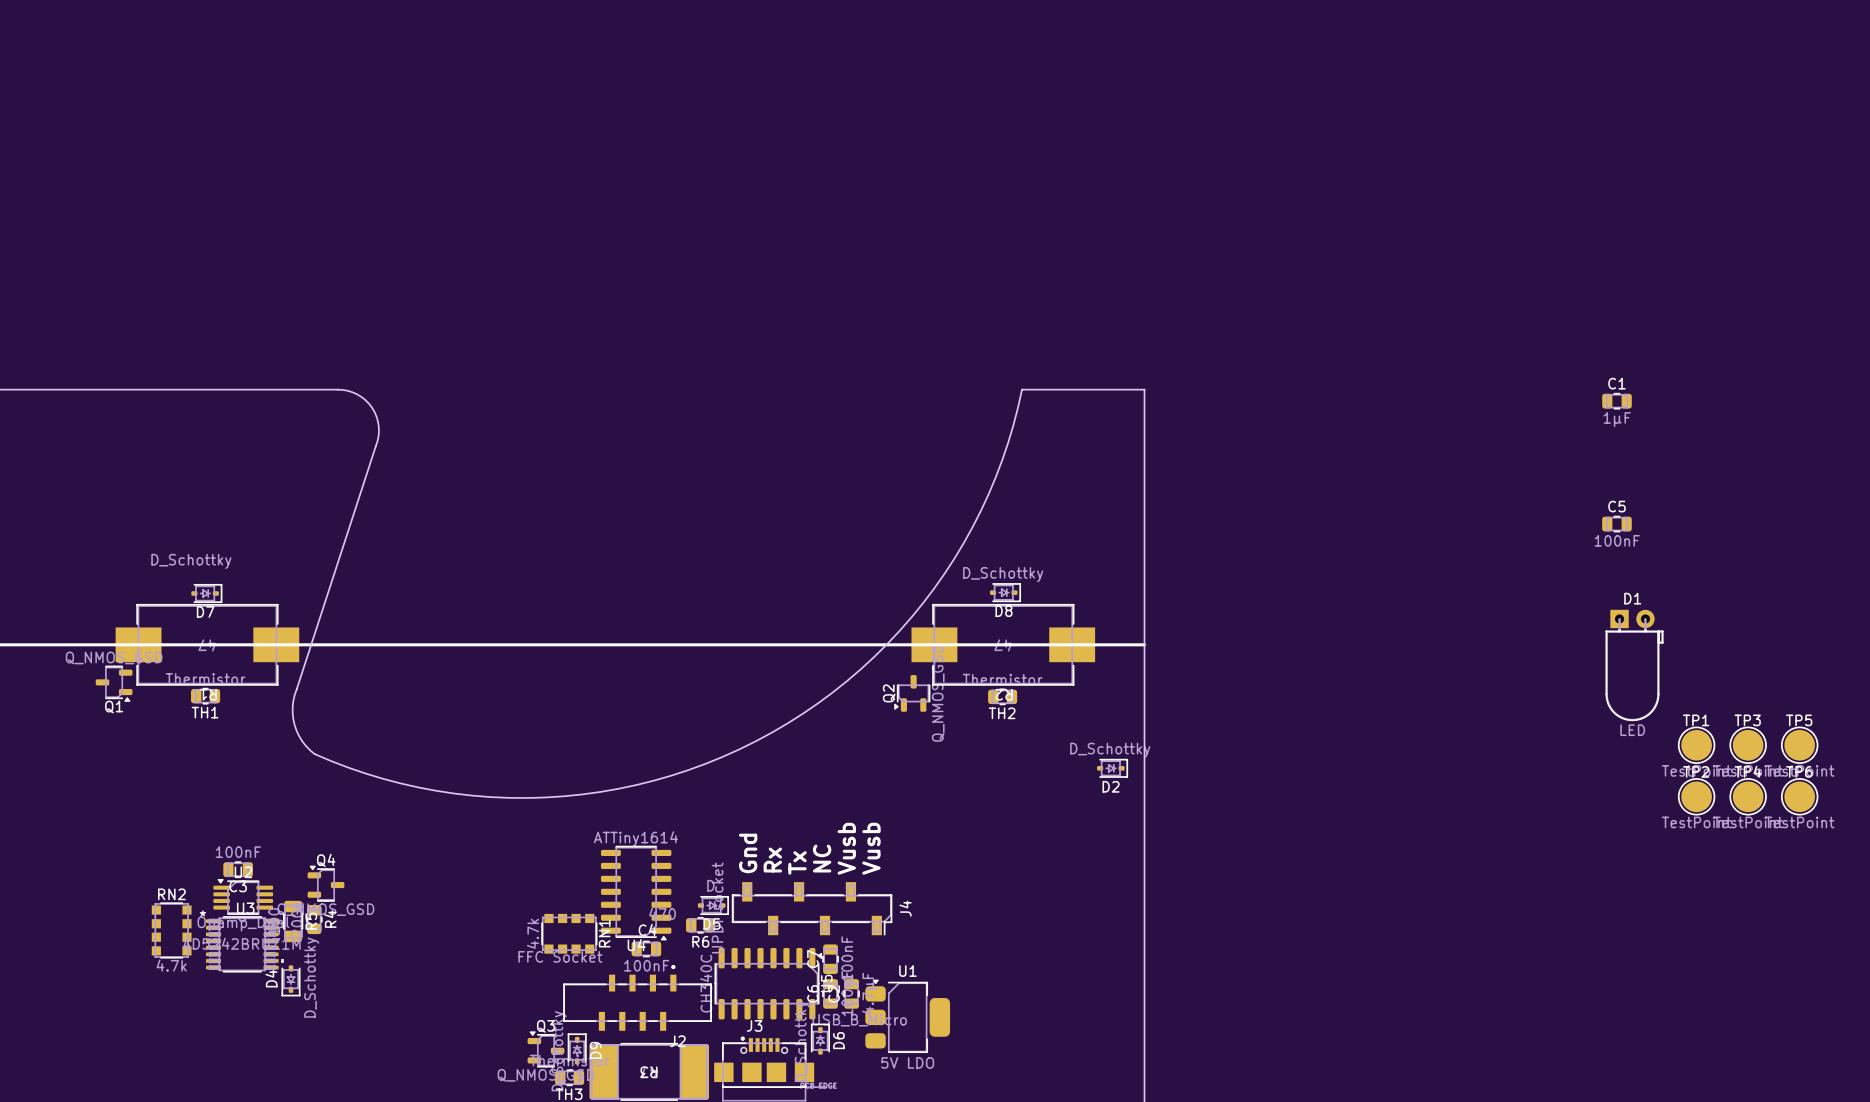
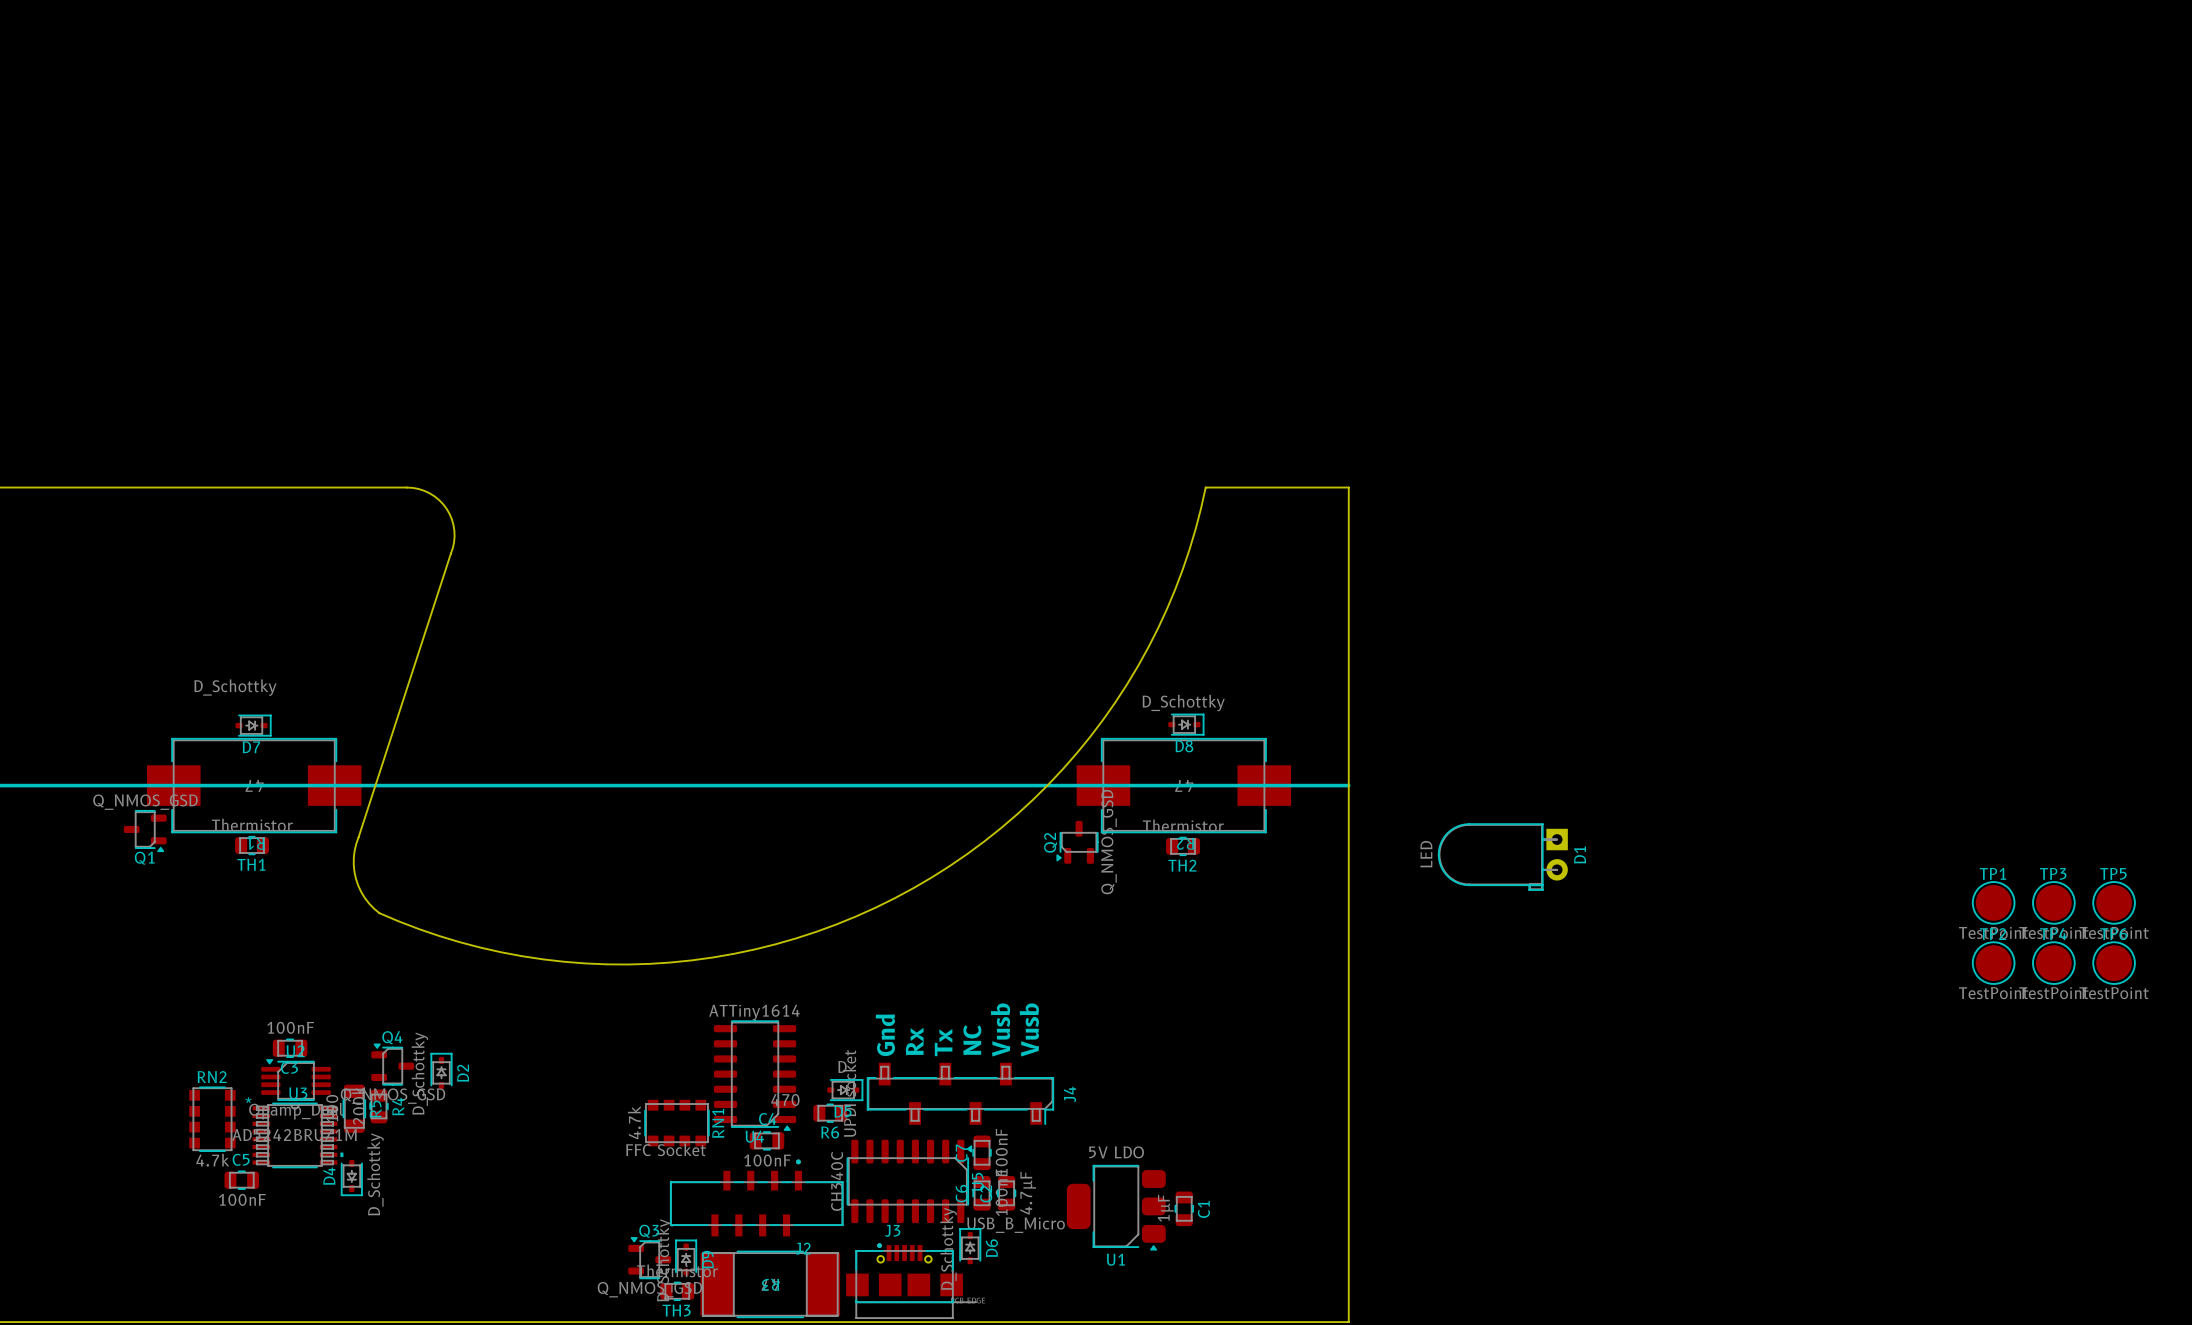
C1 rotation: 0° (1616, 401) -> 90° clockwise (1184, 1208)
C1 position: (1616, 401) -> (1184, 1208)
C5 position: (1616, 524) -> (241, 1180)
D1 rotation: 0° (1634, 665) -> 90° clockwise (1502, 857)
D1 position: (1634, 665) -> (1502, 857)
D2 rotation: 0° (1112, 768) -> 90° counterclockwise (441, 1071)
D2 position: (1112, 768) -> (441, 1071)
U1 rotation: 0° (907, 1016) -> 180° (1116, 1207)

